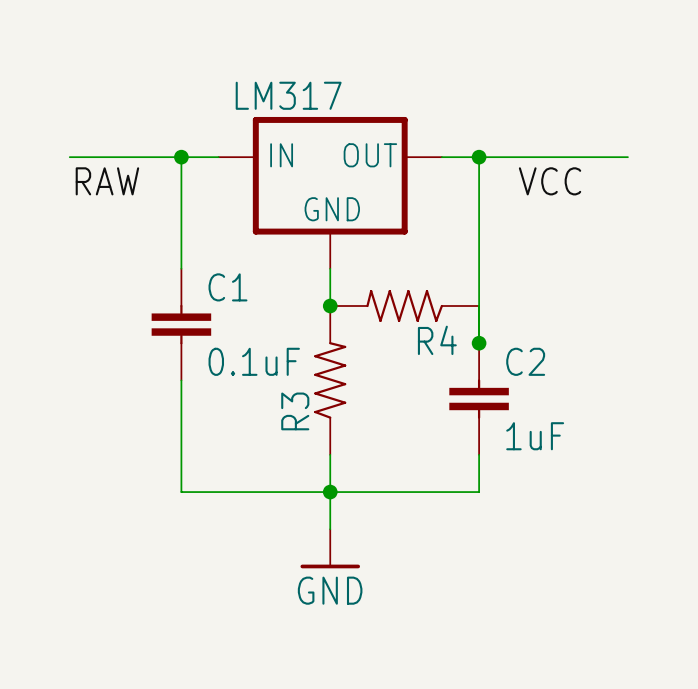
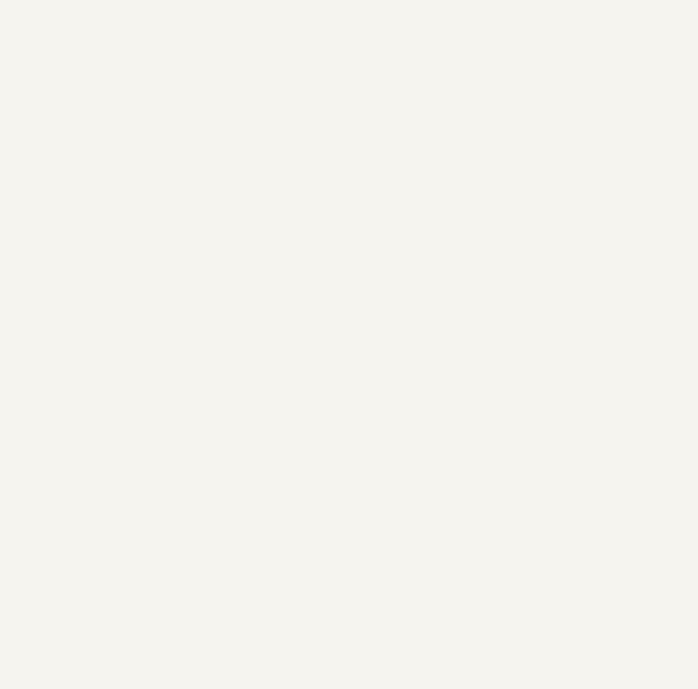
wire: (69, 157) (218, 157) -> none
wire: (181, 157) (181, 268) -> none
junction: (181, 157) -> none
wire: (441, 157) (627, 157) -> none
wire: (479, 157) (479, 343) -> none
junction: (479, 157) -> none
label: RAW (107, 181) -> none
label: VCC (550, 181) -> none
LM317: (330, 192) -> none
wire: (330, 268) (330, 306) -> none
junction: (330, 306) -> none
R4: (404, 306) -> none
C1: 0.1uF (181, 324) -> none
junction: (479, 343) -> none
wire: (181, 380) (181, 492) (479, 492) (479, 454) -> none
R3: (330, 380) -> none
C2: 1uF (479, 399) -> none
wire: (330, 454) (330, 529) -> none
junction: (330, 492) -> none
power symbol: GND (330, 548) -> none

